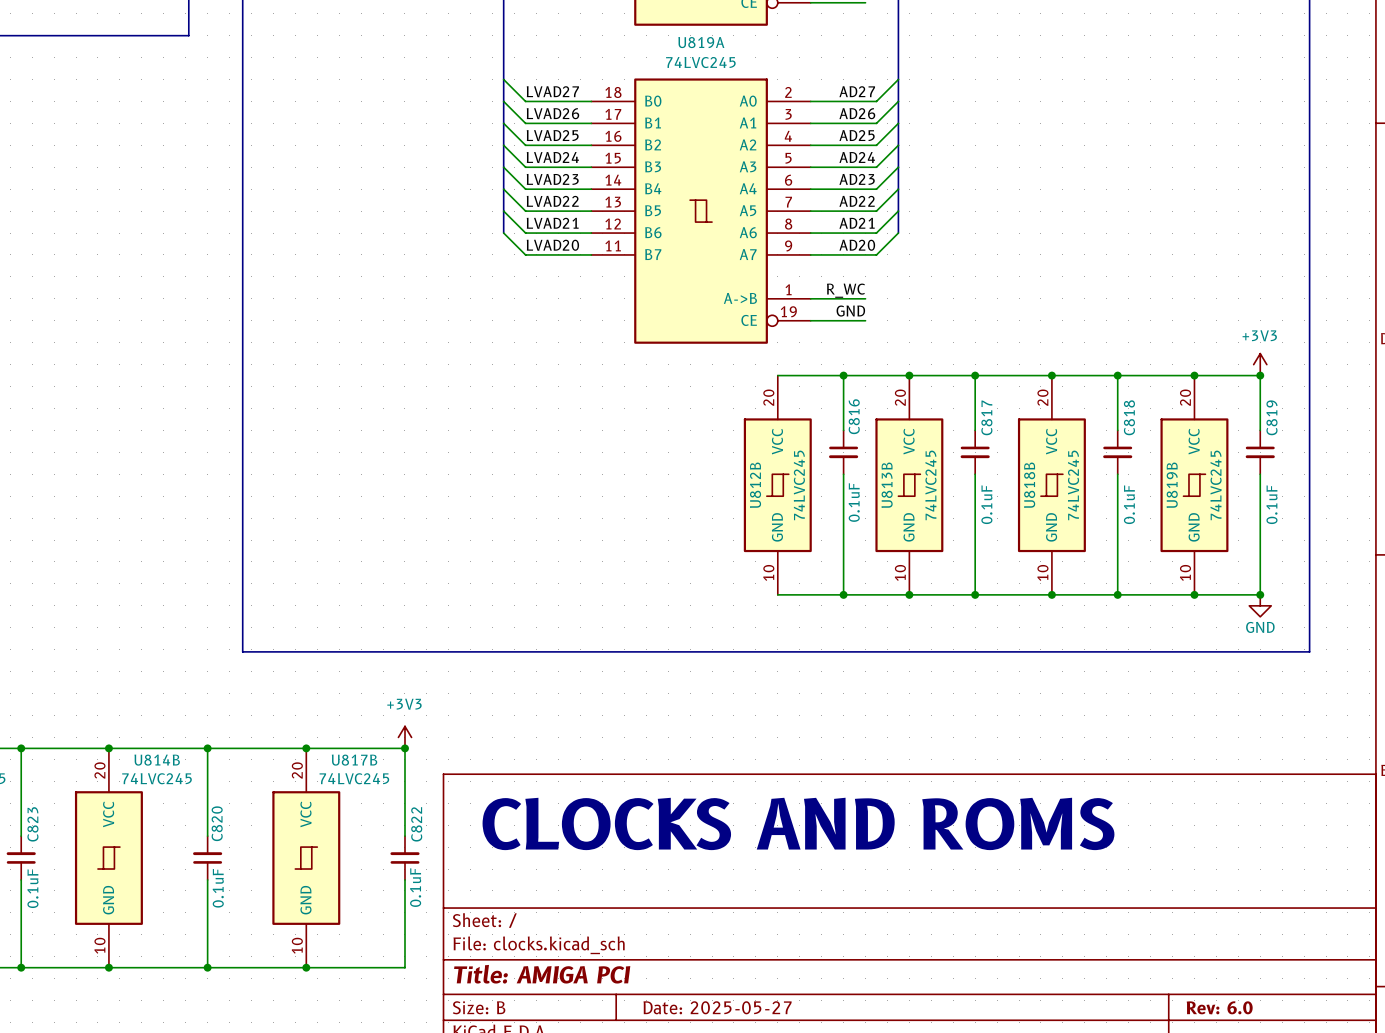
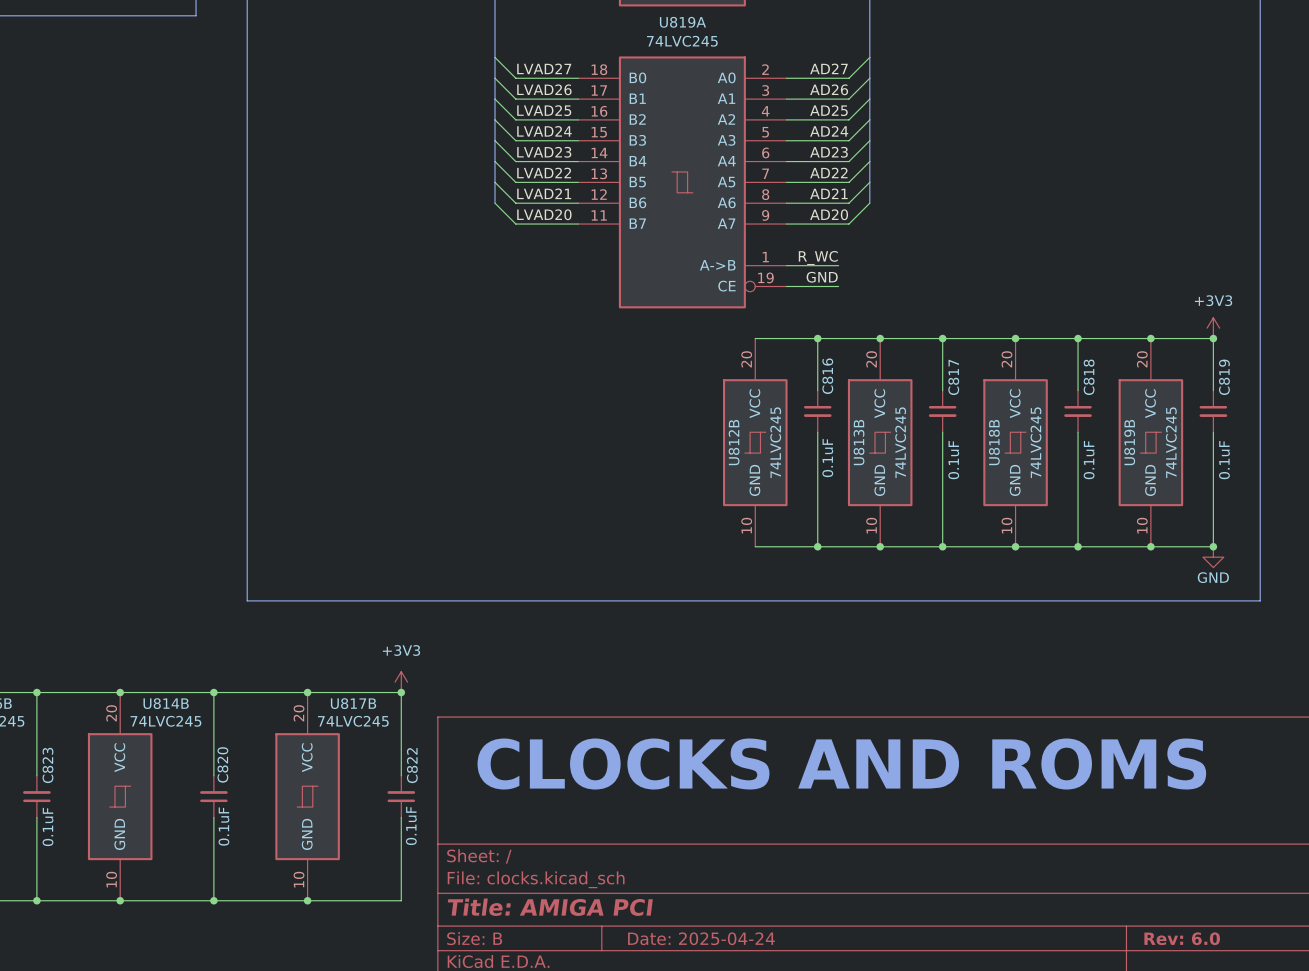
title block: Date: 2025-05-27 (717, 1007) -> Date: 2025-04-24 (701, 938)

